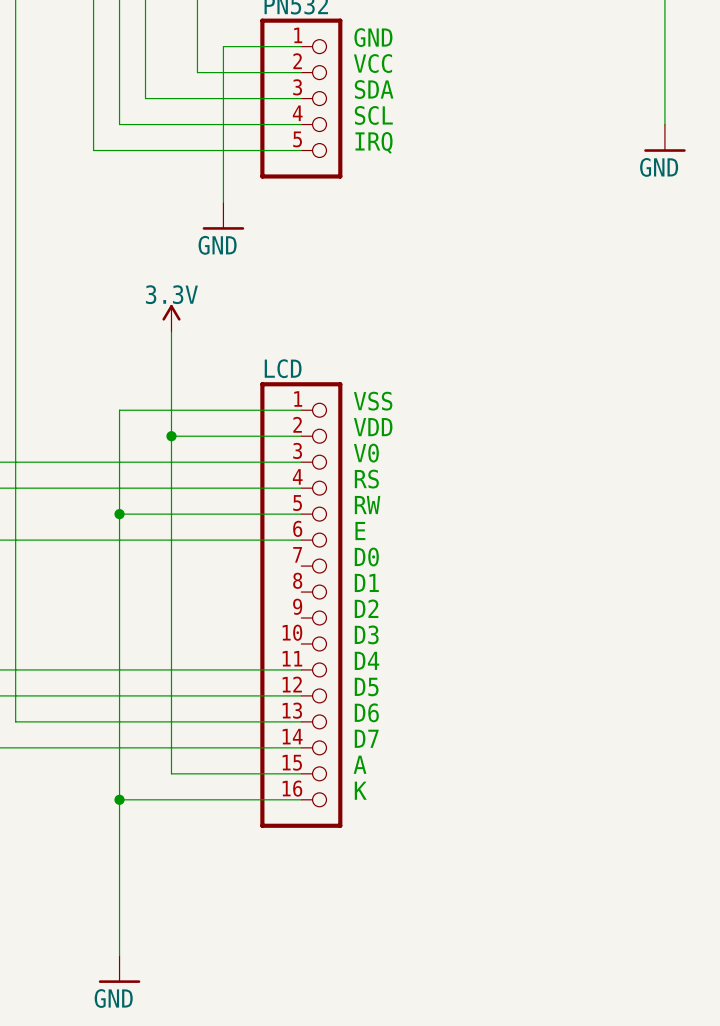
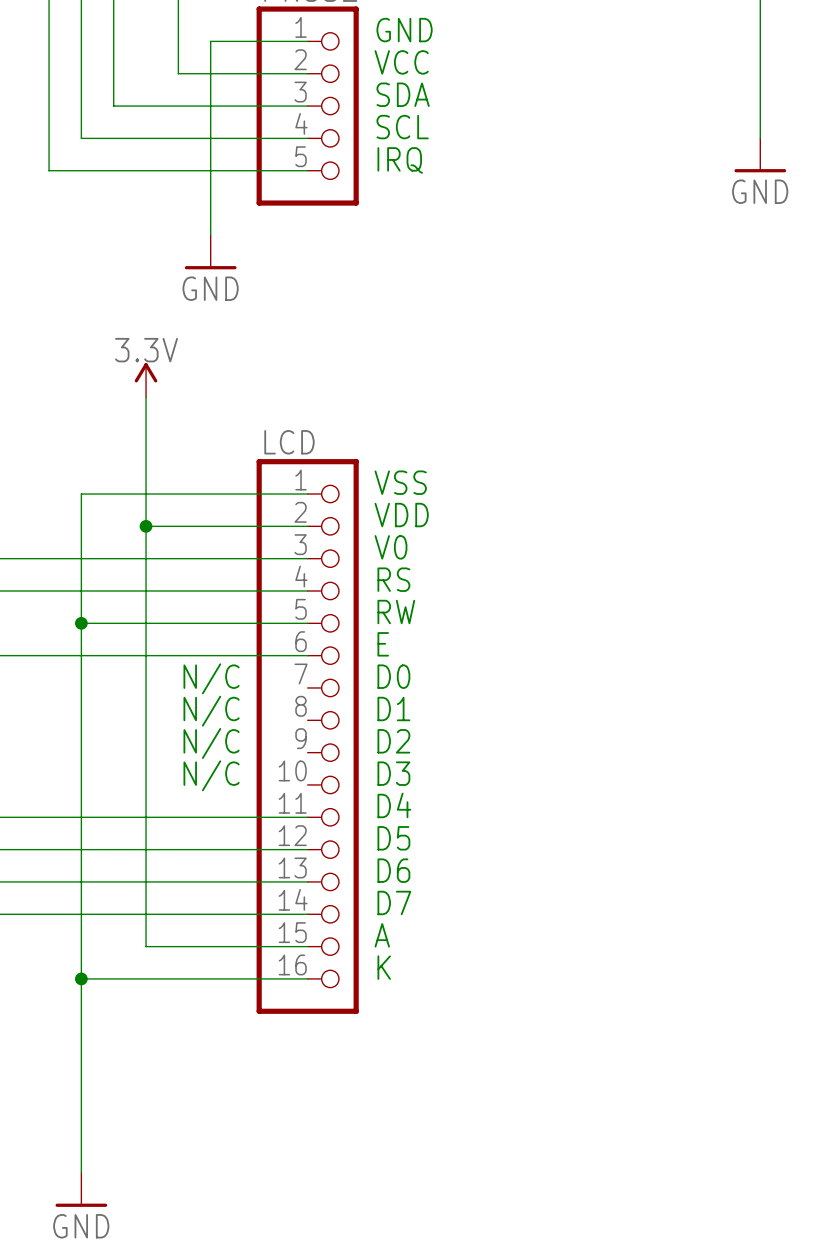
text: none -> N/C (211, 678)
text: none -> N/C (211, 711)
text: none -> N/C (211, 743)
text: none -> N/C (211, 775)

